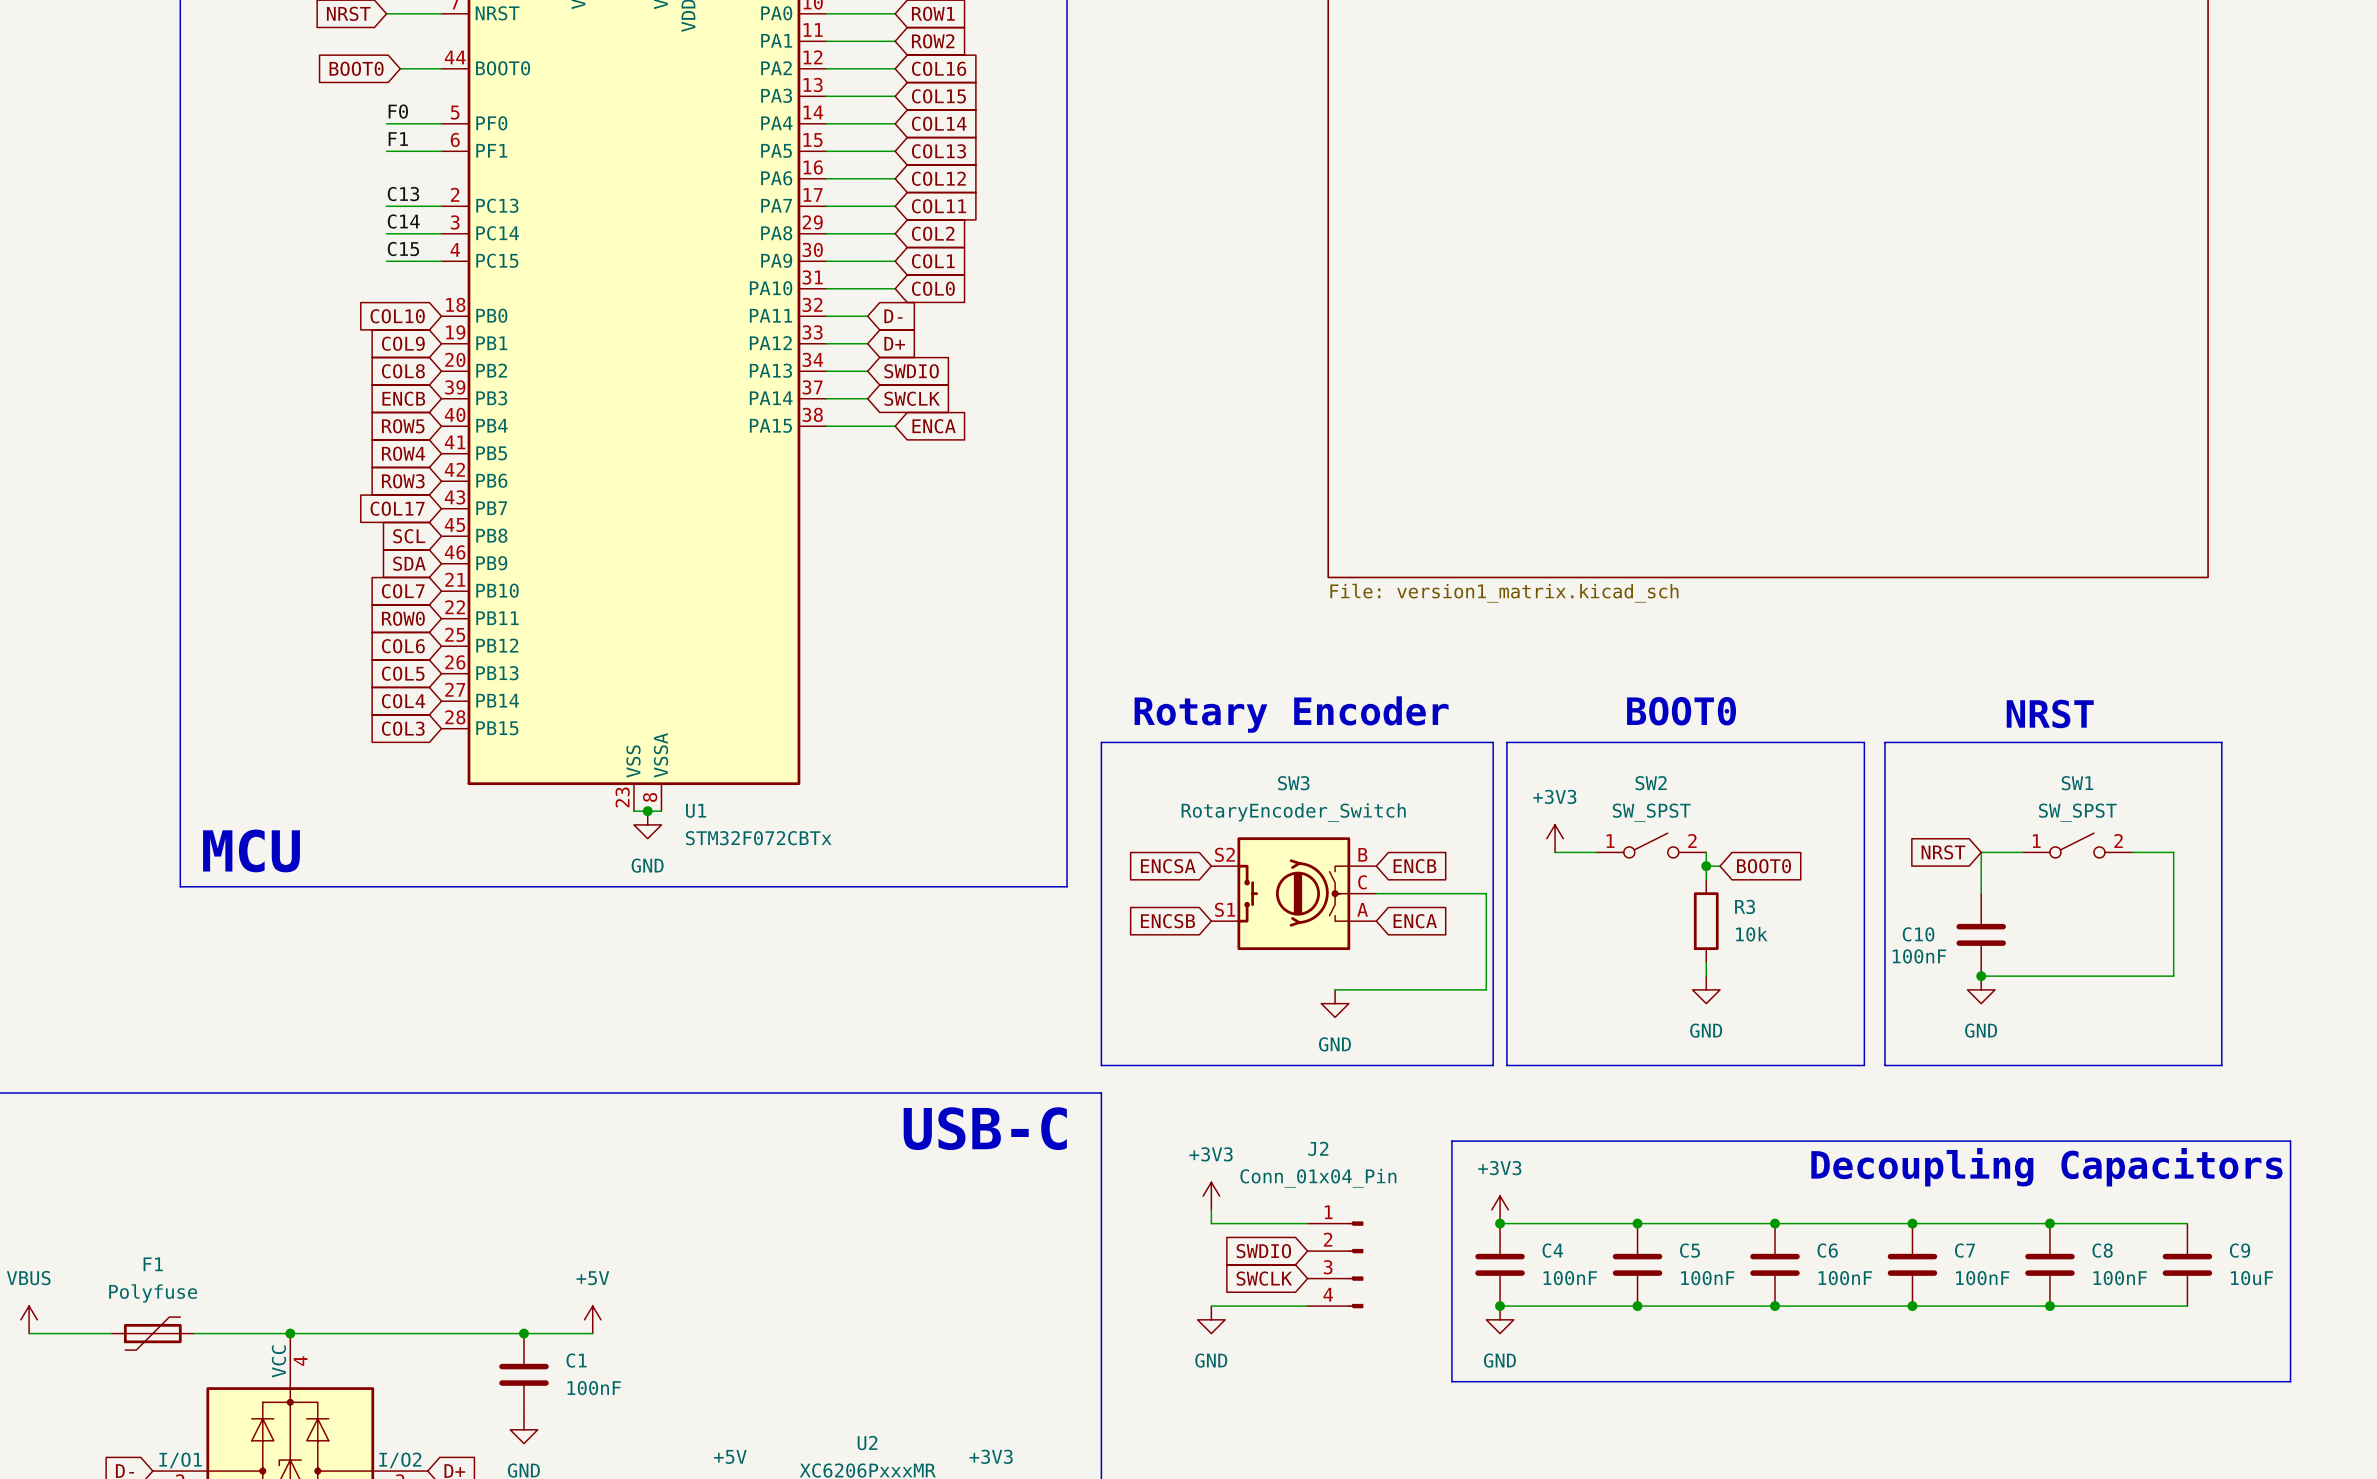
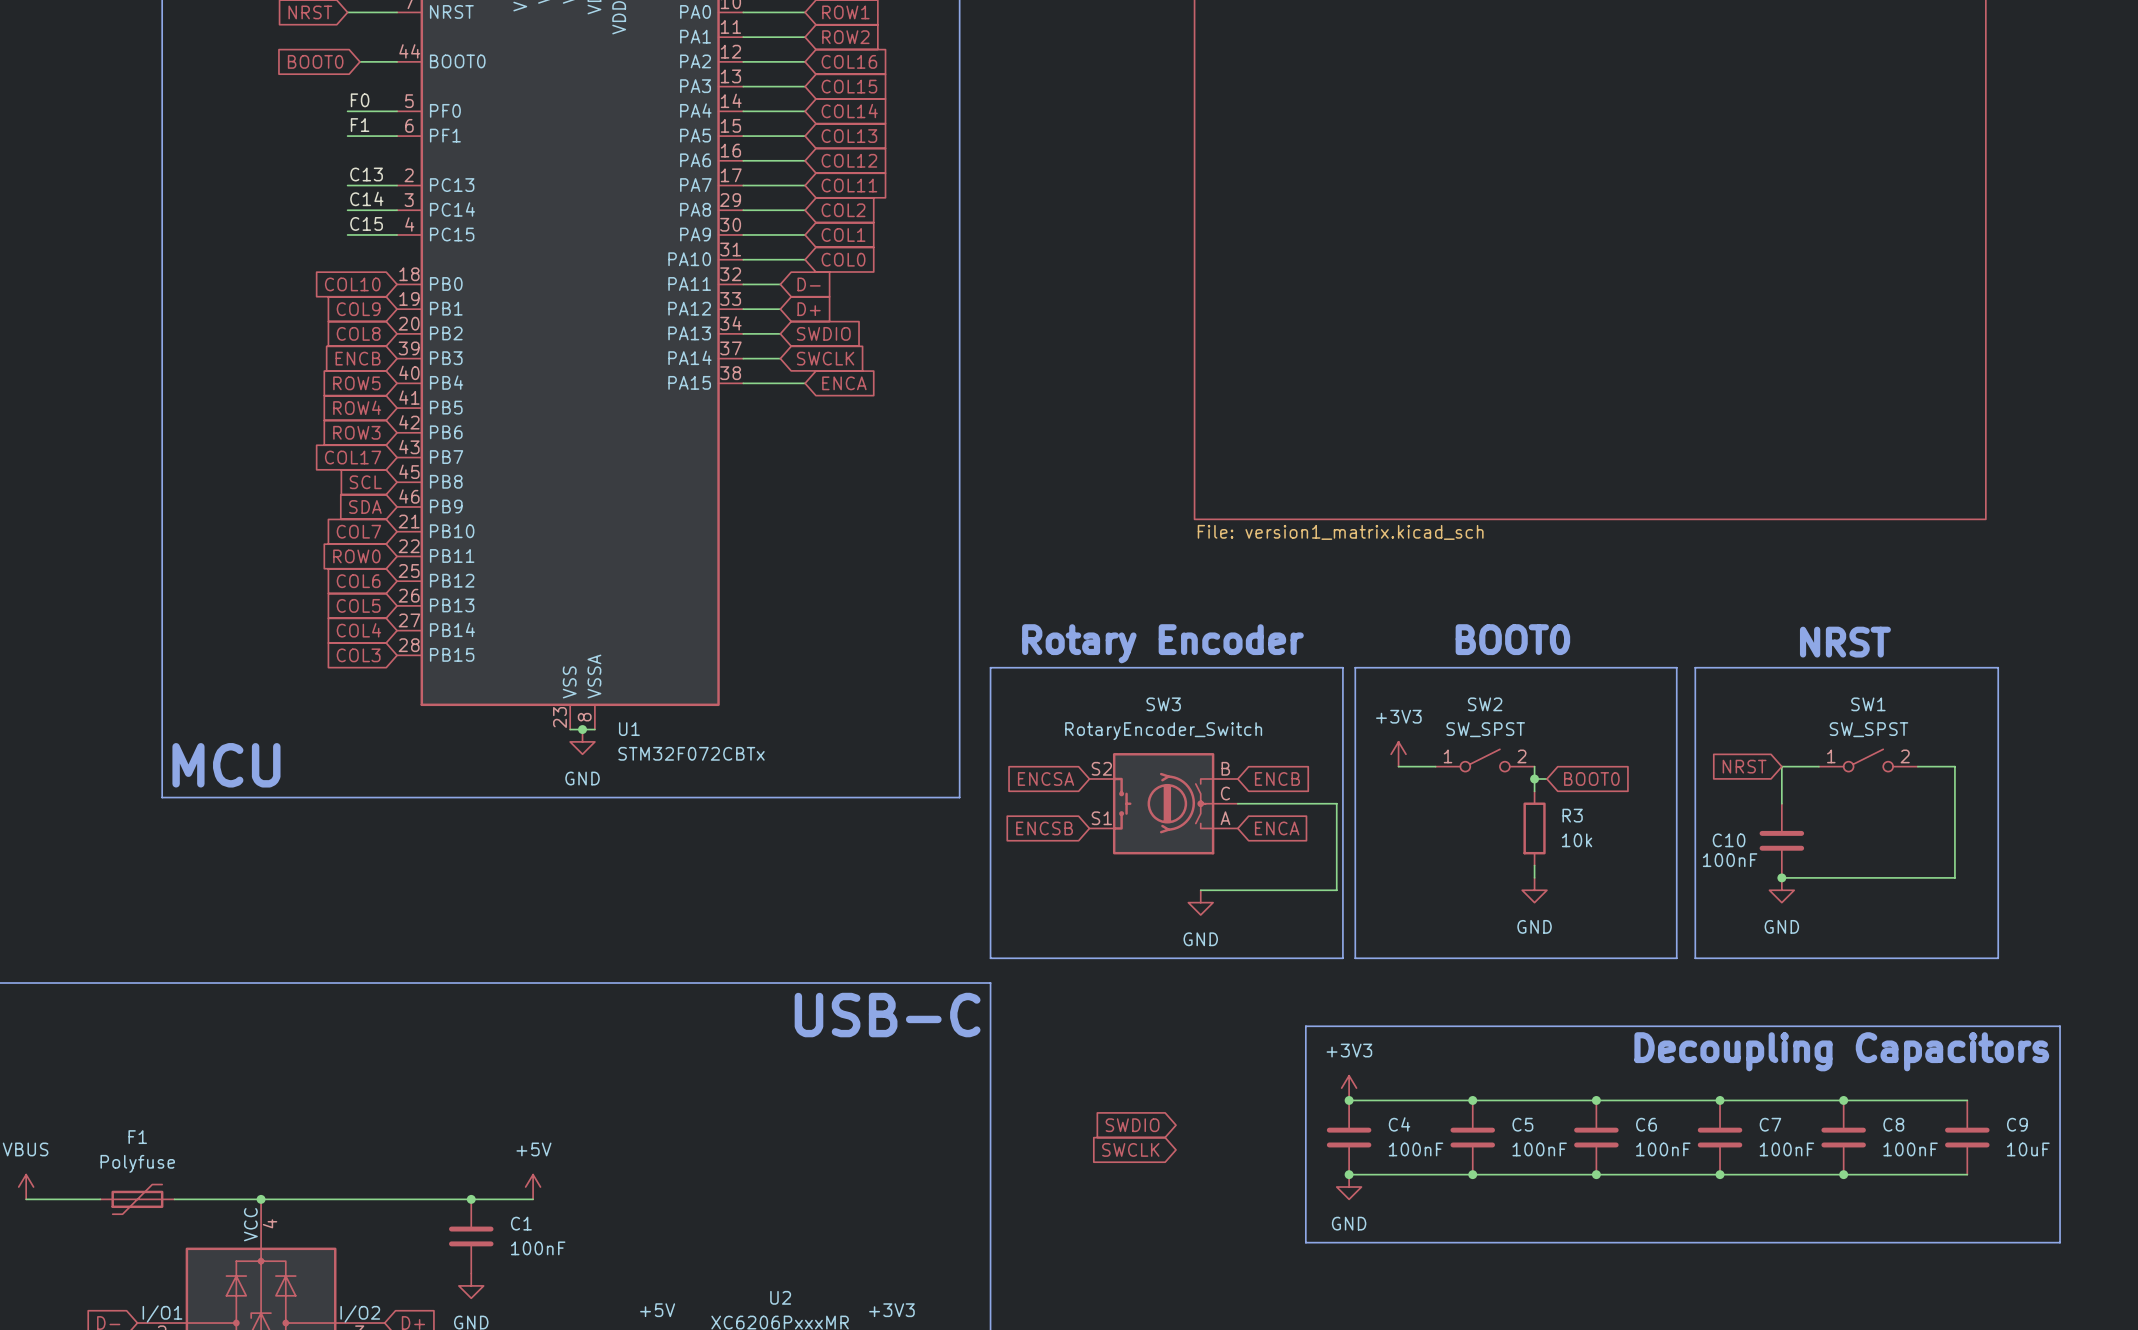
power symbol: +3V3 (1211, 1196) -> none
wire: (1211, 1209) (1211, 1223) (1307, 1223) -> none
J2: Conn_01x04_Pin (1335, 1264) -> none
wire: (1211, 1306) (1307, 1306) -> none
power symbol: GND (1211, 1319) -> none

